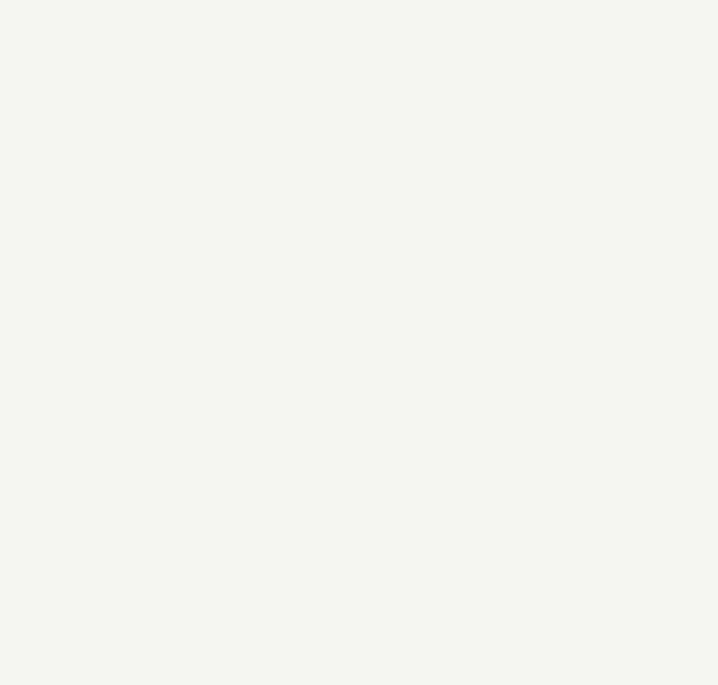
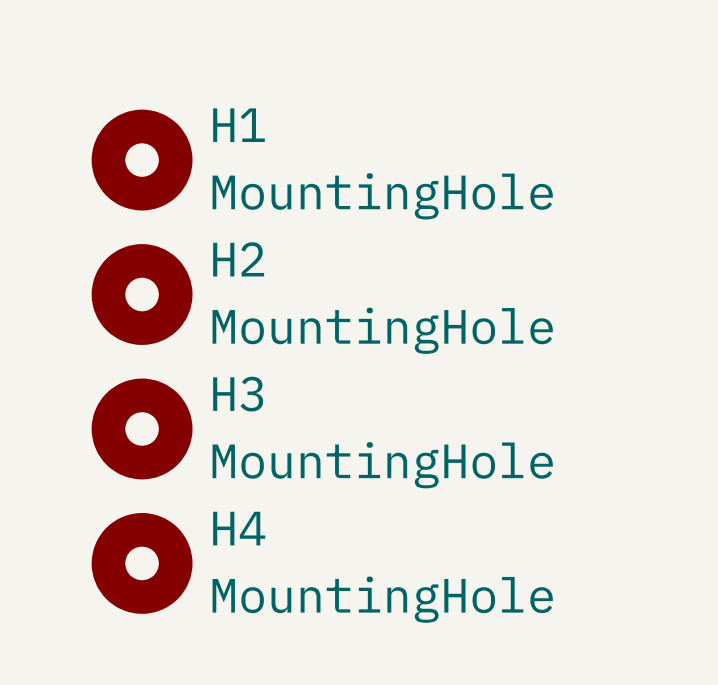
H1: none -> MountingHole (142, 160)
H2: none -> MountingHole (142, 294)
H3: none -> MountingHole (142, 428)
H4: none -> MountingHole (142, 563)

